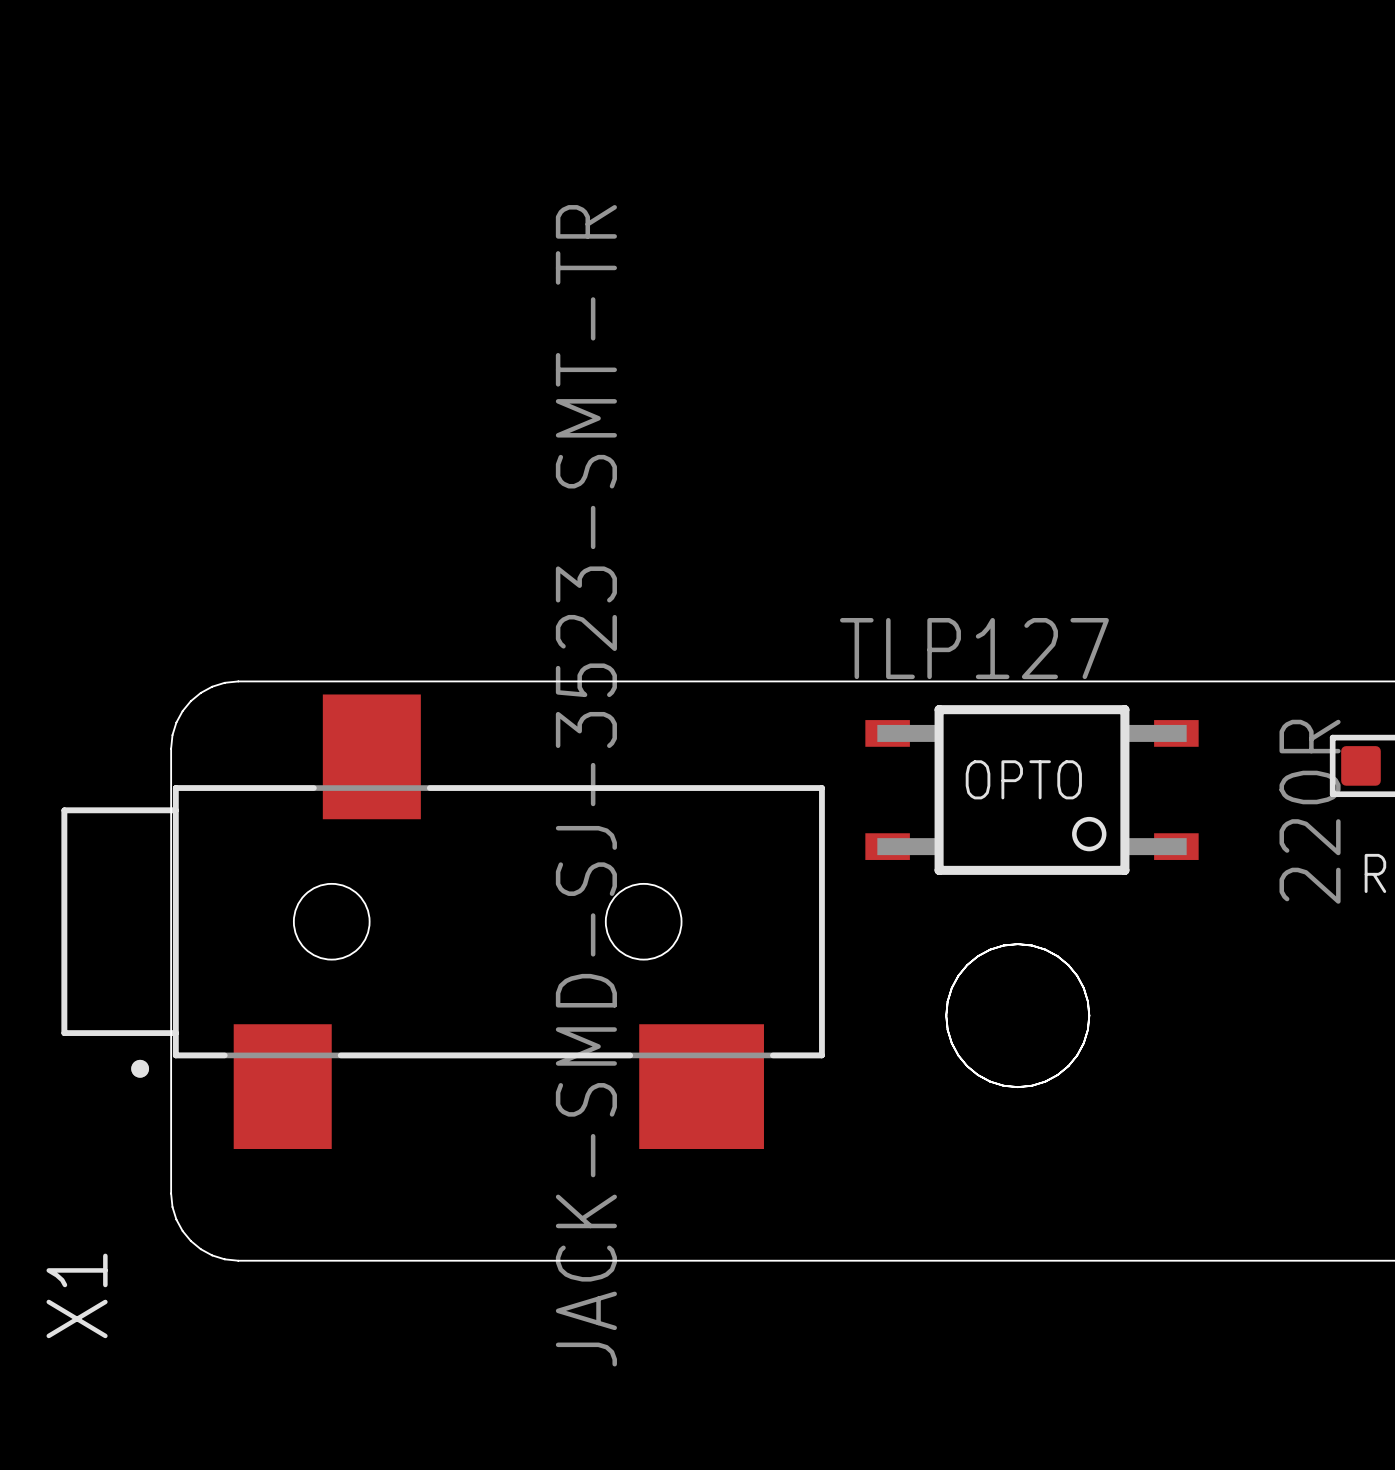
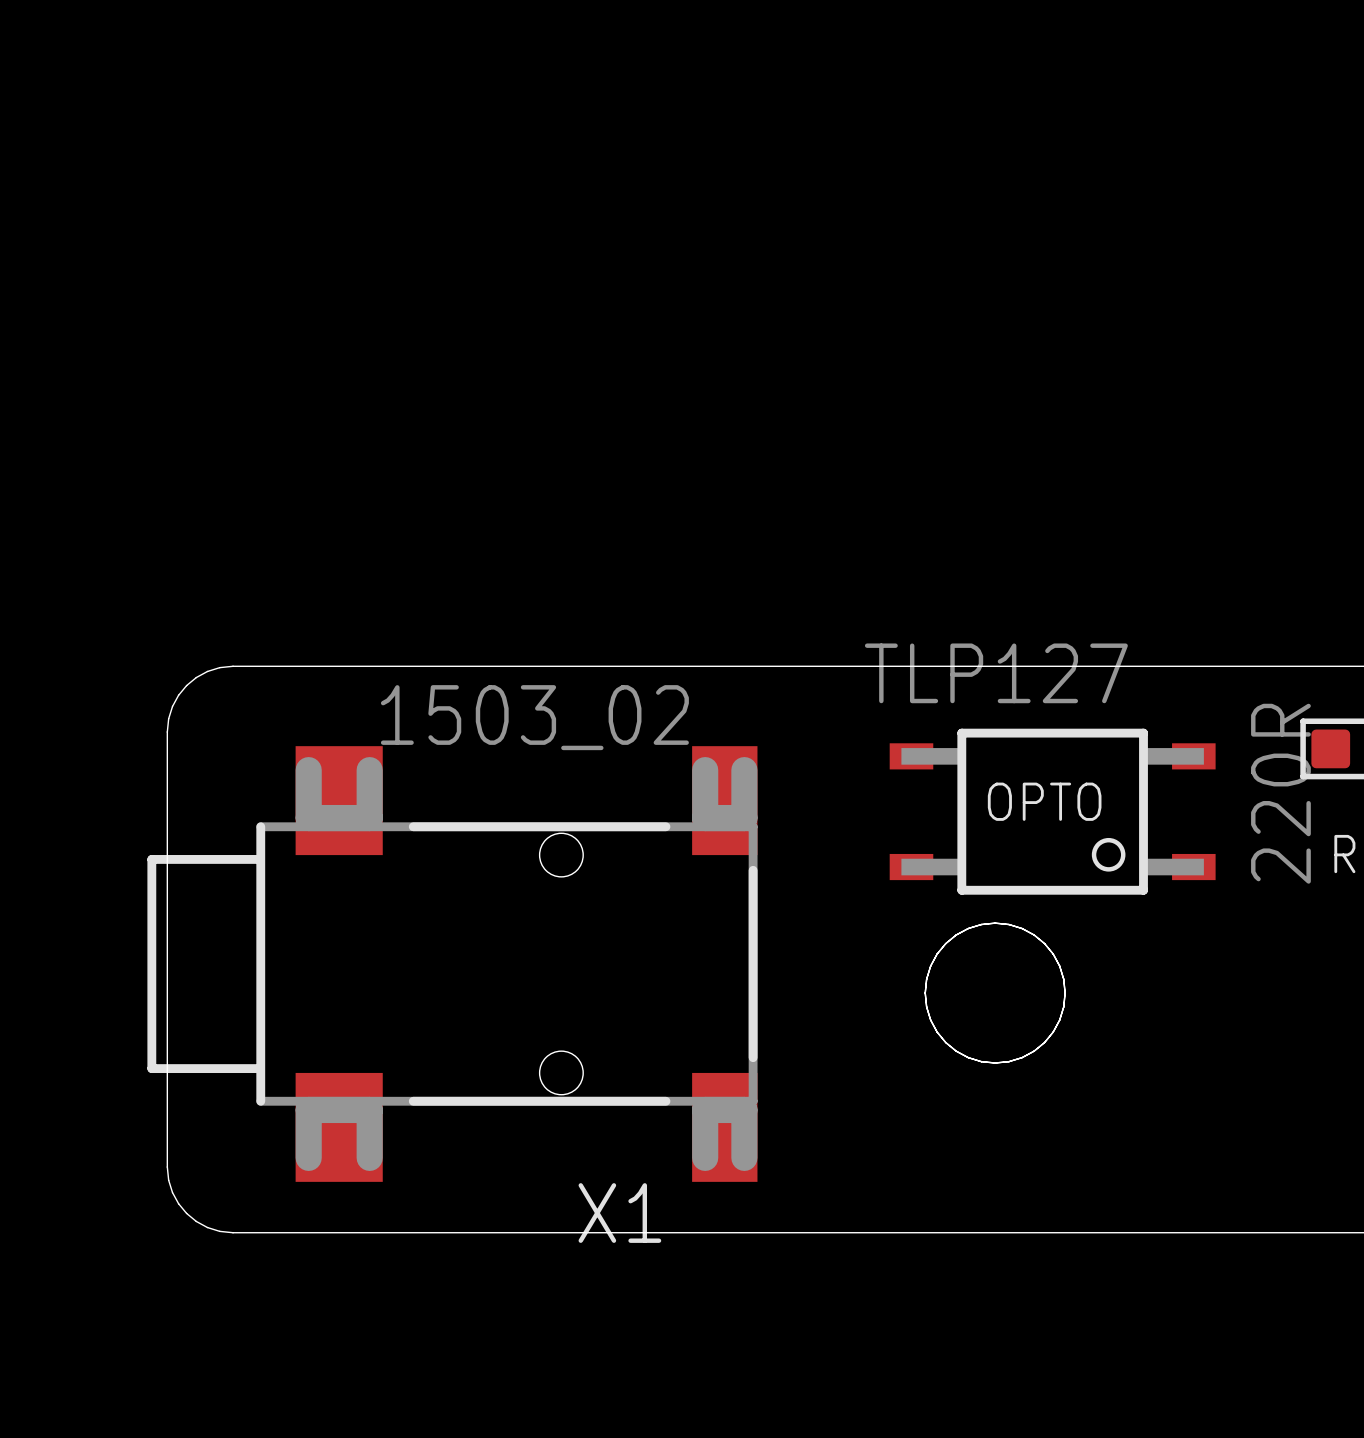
X1 footprint: [61, 694, 825, 1149] -> [147, 746, 758, 1182]
X1 value: JACK-SMD-SJ-3523-SMT-TR (586, 785) -> 1503_02 (534, 717)
OPTO position: (1032, 790) -> (1052, 811)
X1 name position: X1 (77, 1295) -> X1 (619, 1213)

